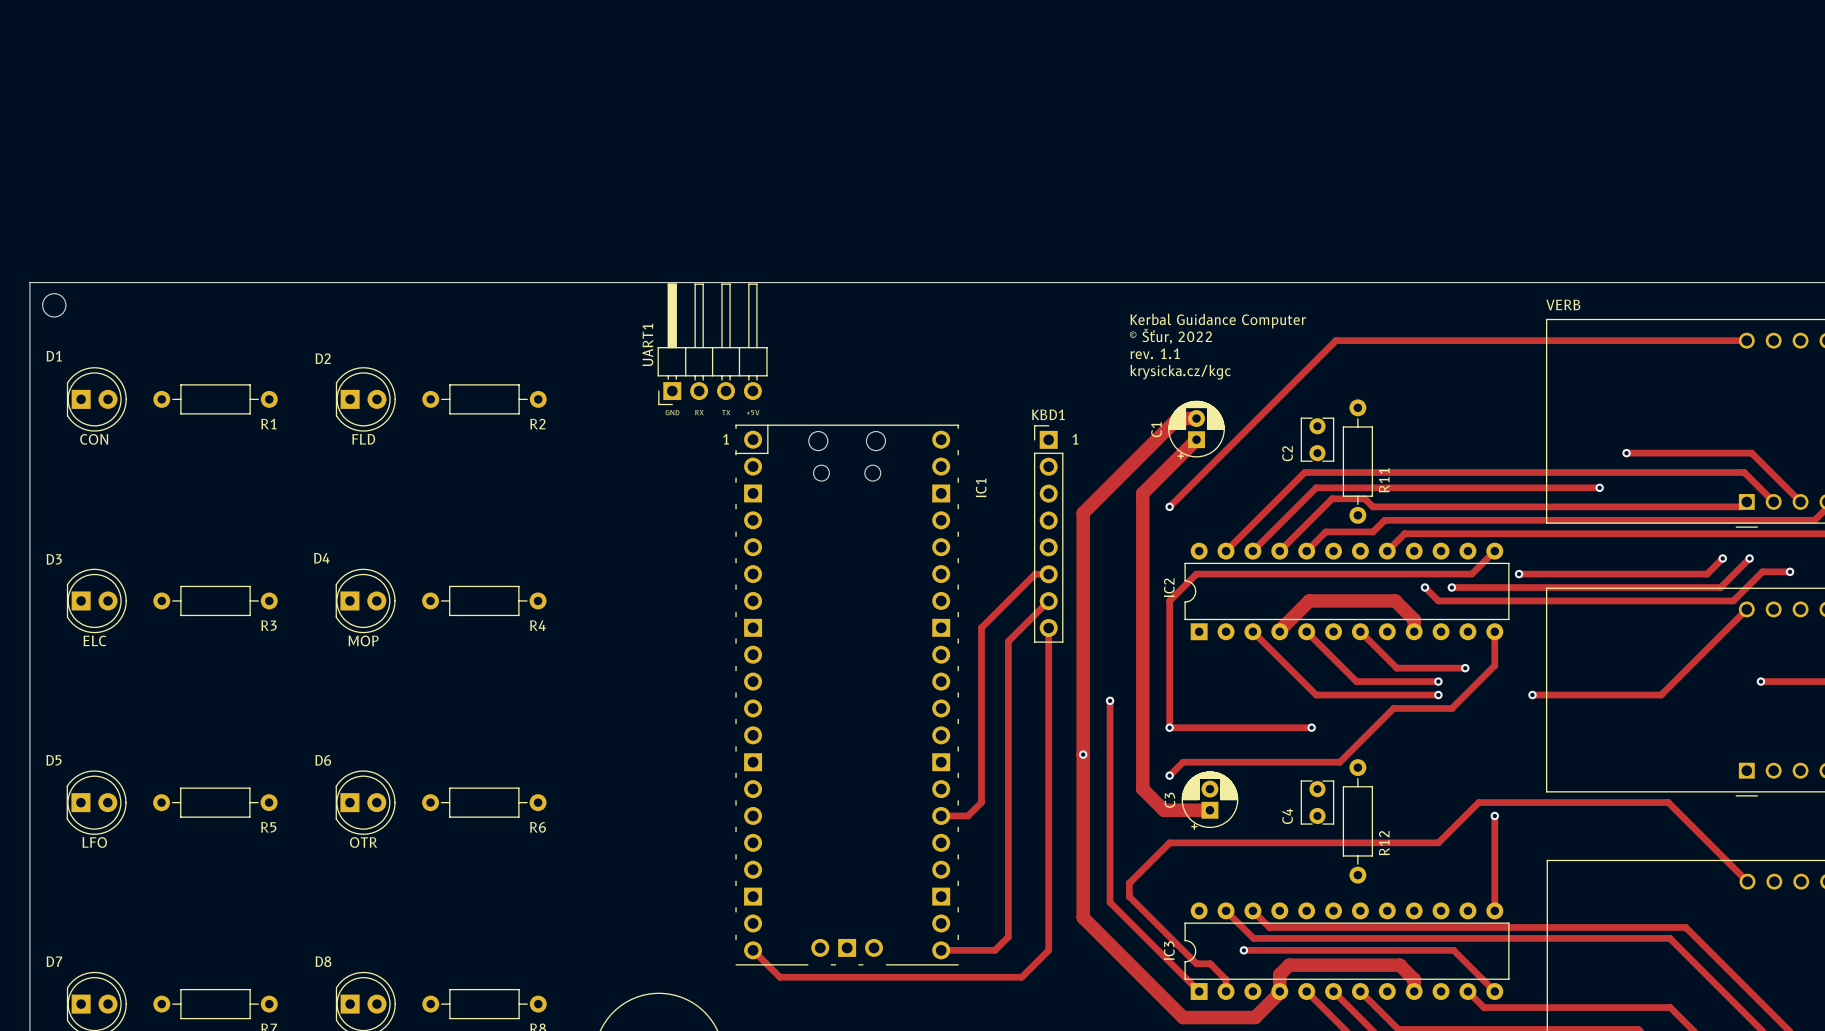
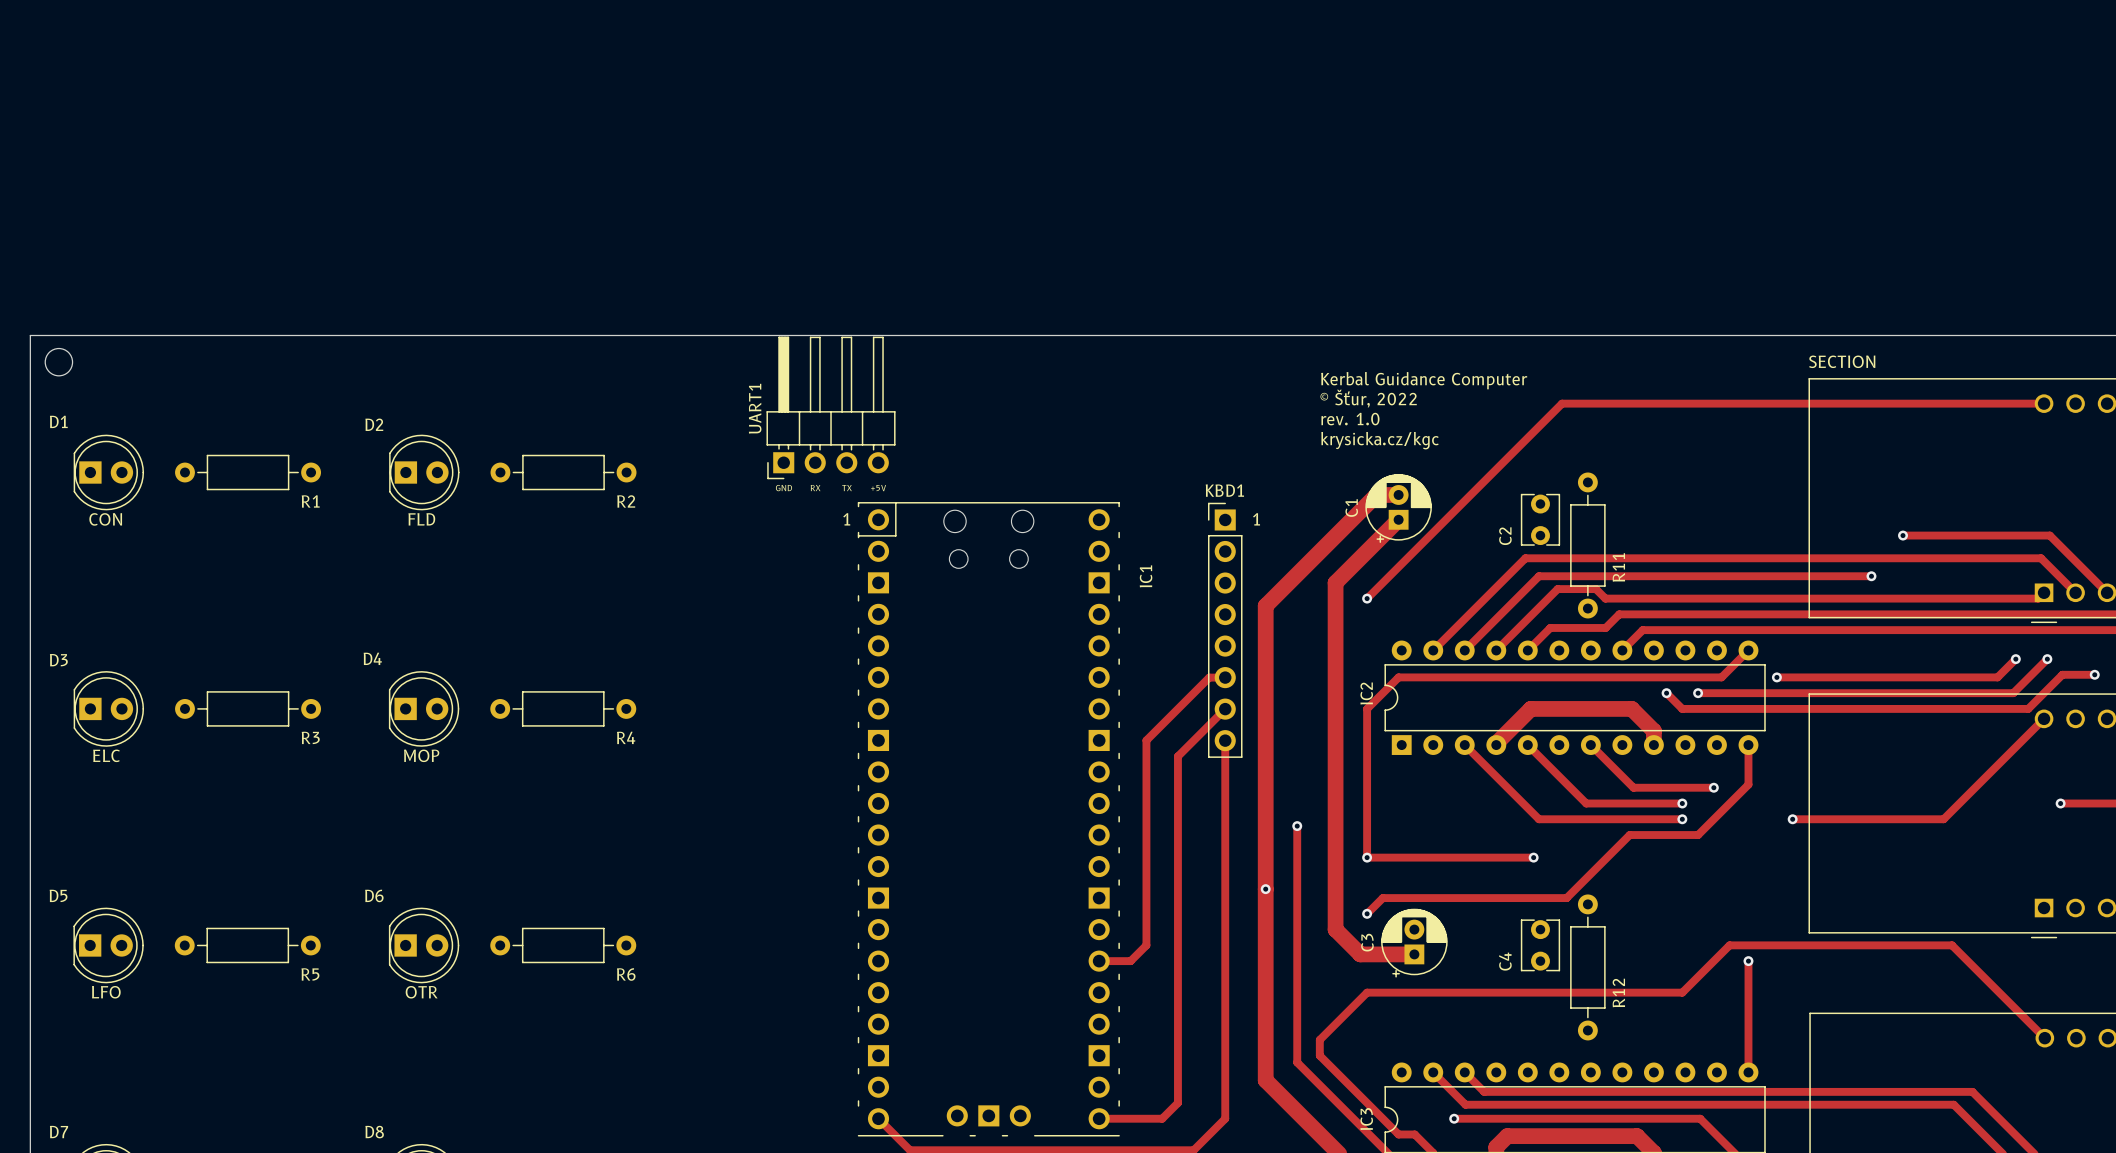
text: VERB (1563, 304) -> SECTION (1842, 361)
text: rev. 1.1 (1155, 353) -> rev. 1.0 (1350, 419)

